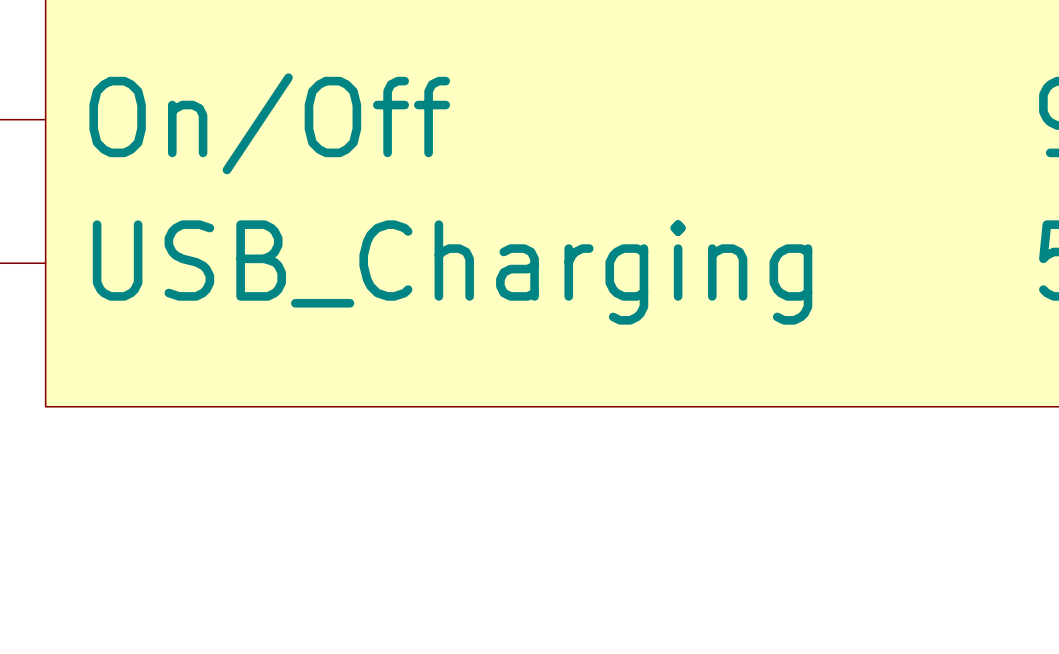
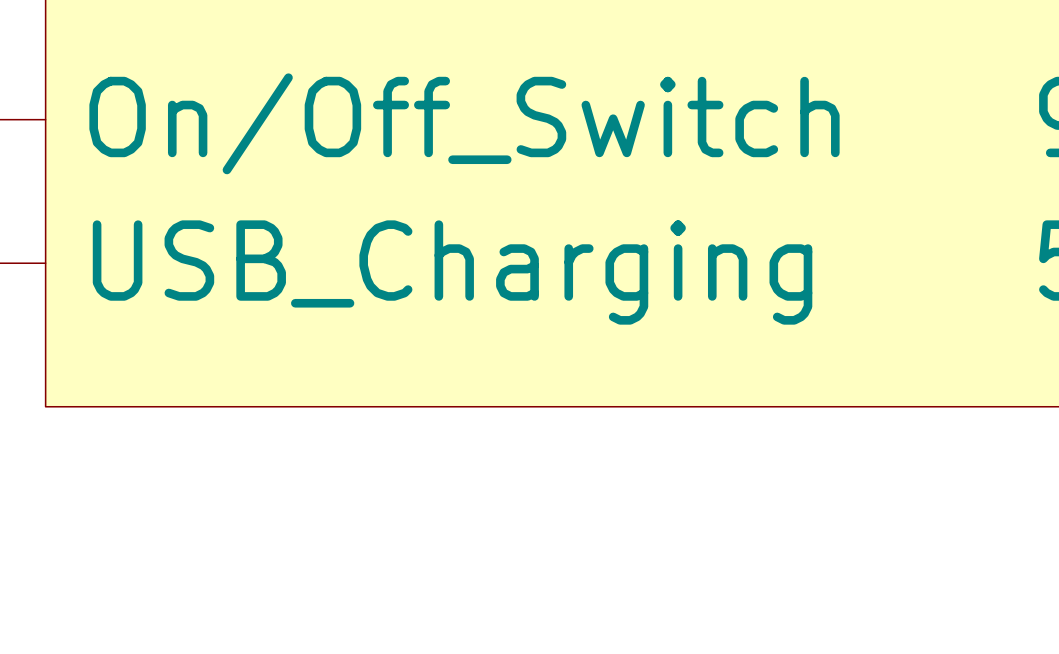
part pin name: On/Off (269, 123) -> On/Off_Switch (464, 123)

